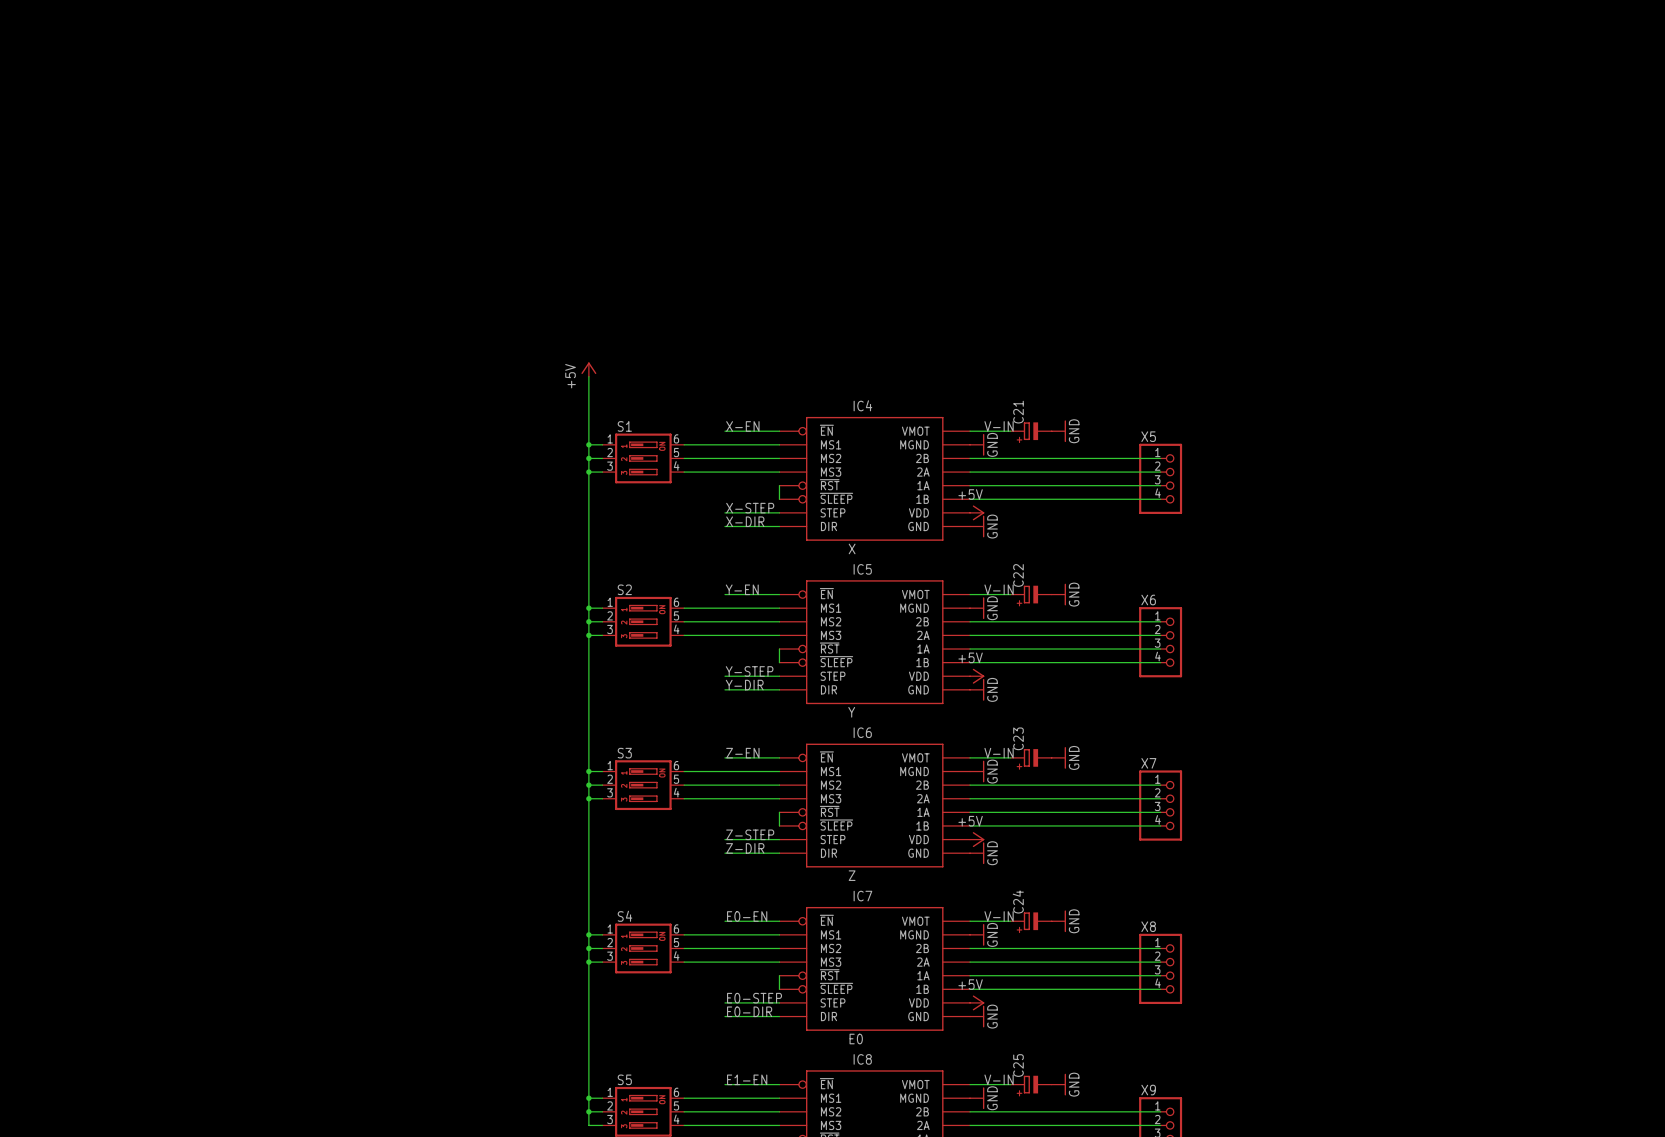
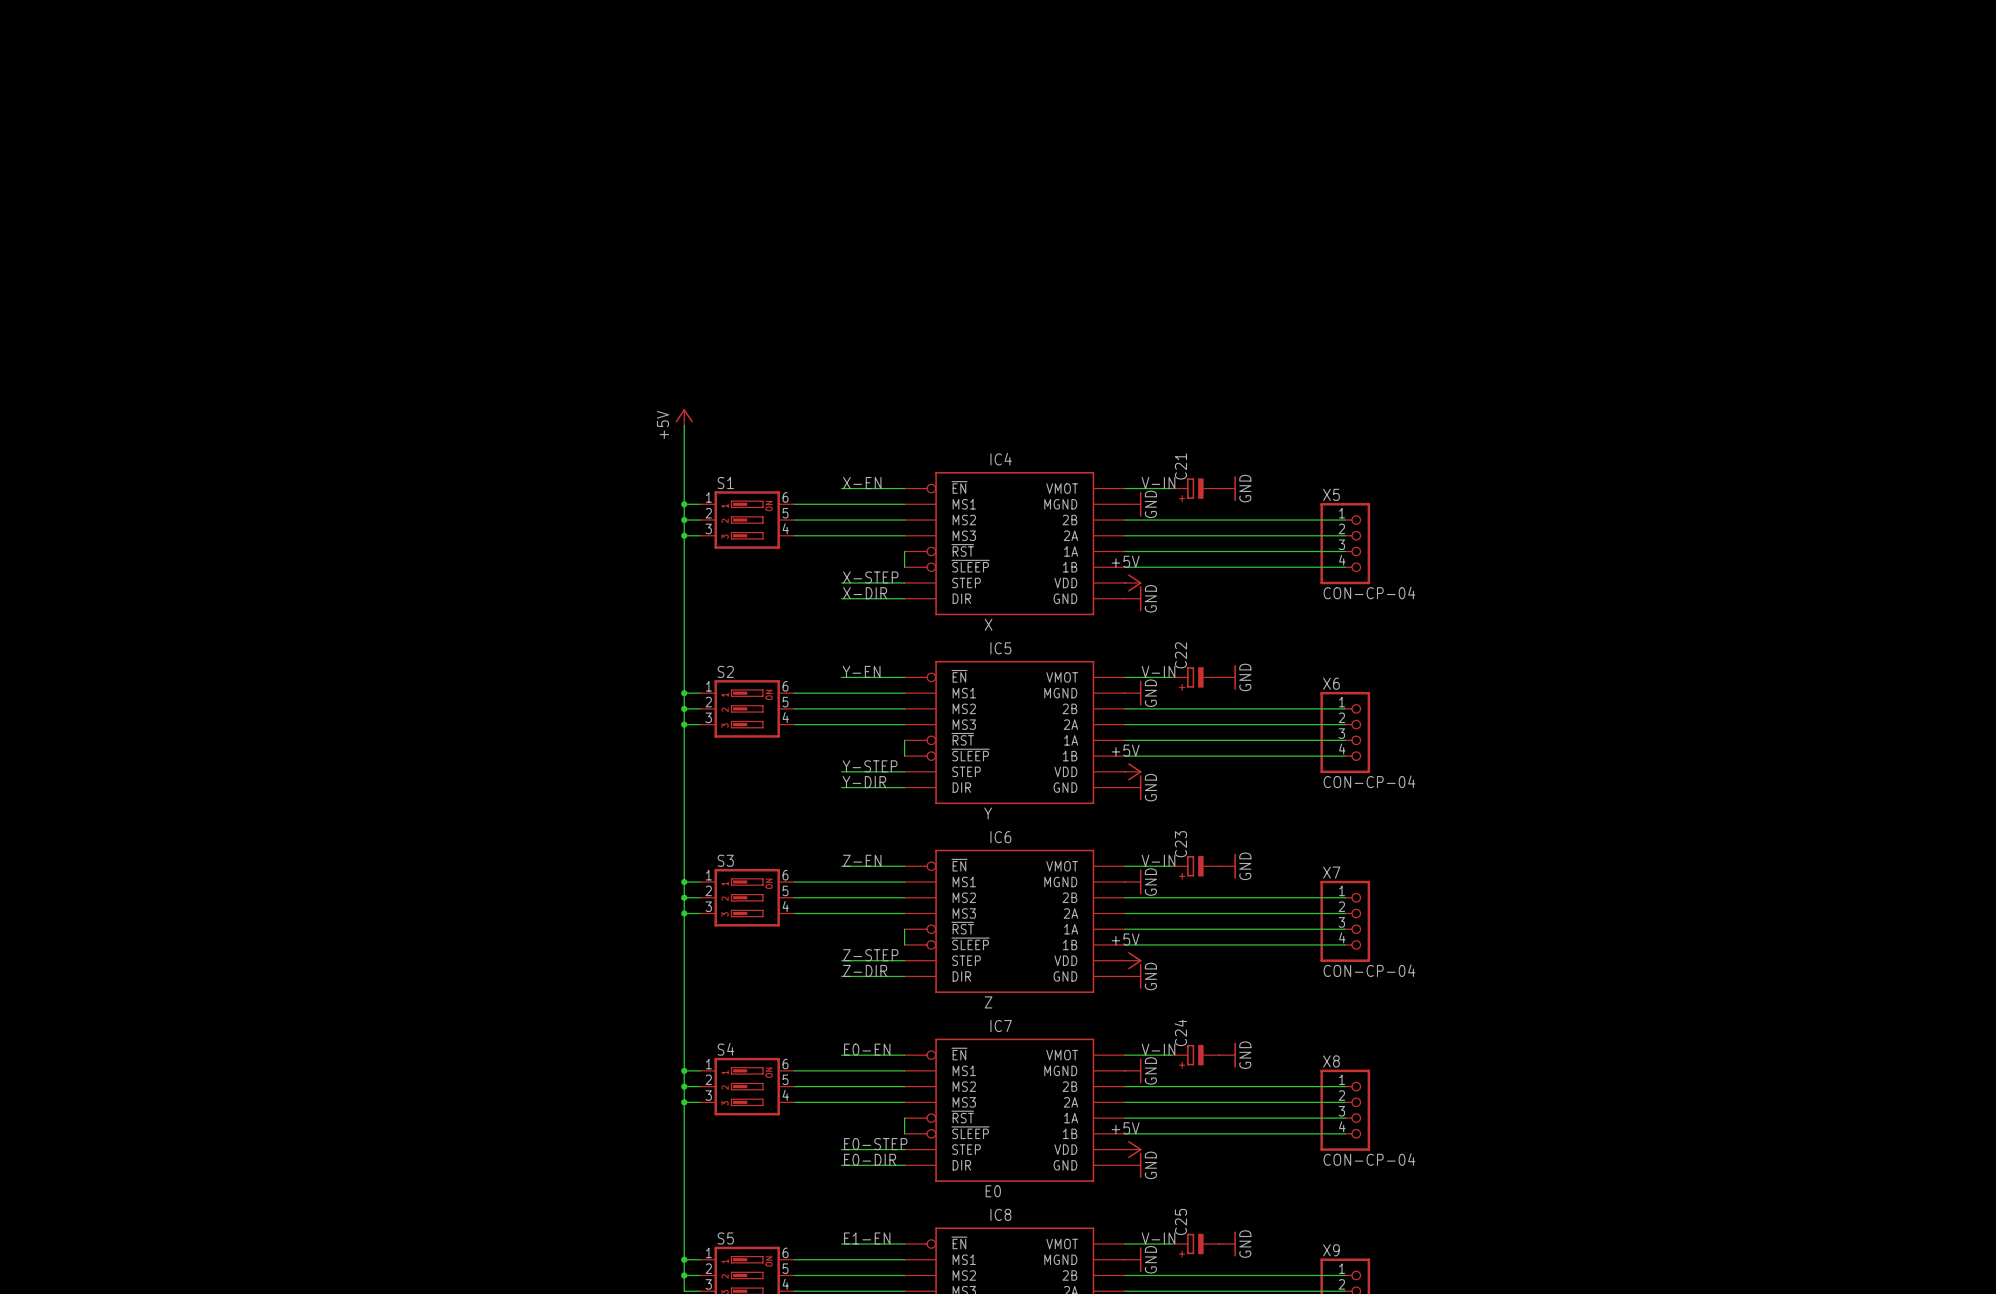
X5 value: none -> CON-CP-04 (1369, 592)
X6 value: none -> CON-CP-04 (1369, 781)
X7 value: none -> CON-CP-04 (1369, 970)
X8 value: none -> CON-CP-04 (1369, 1159)

